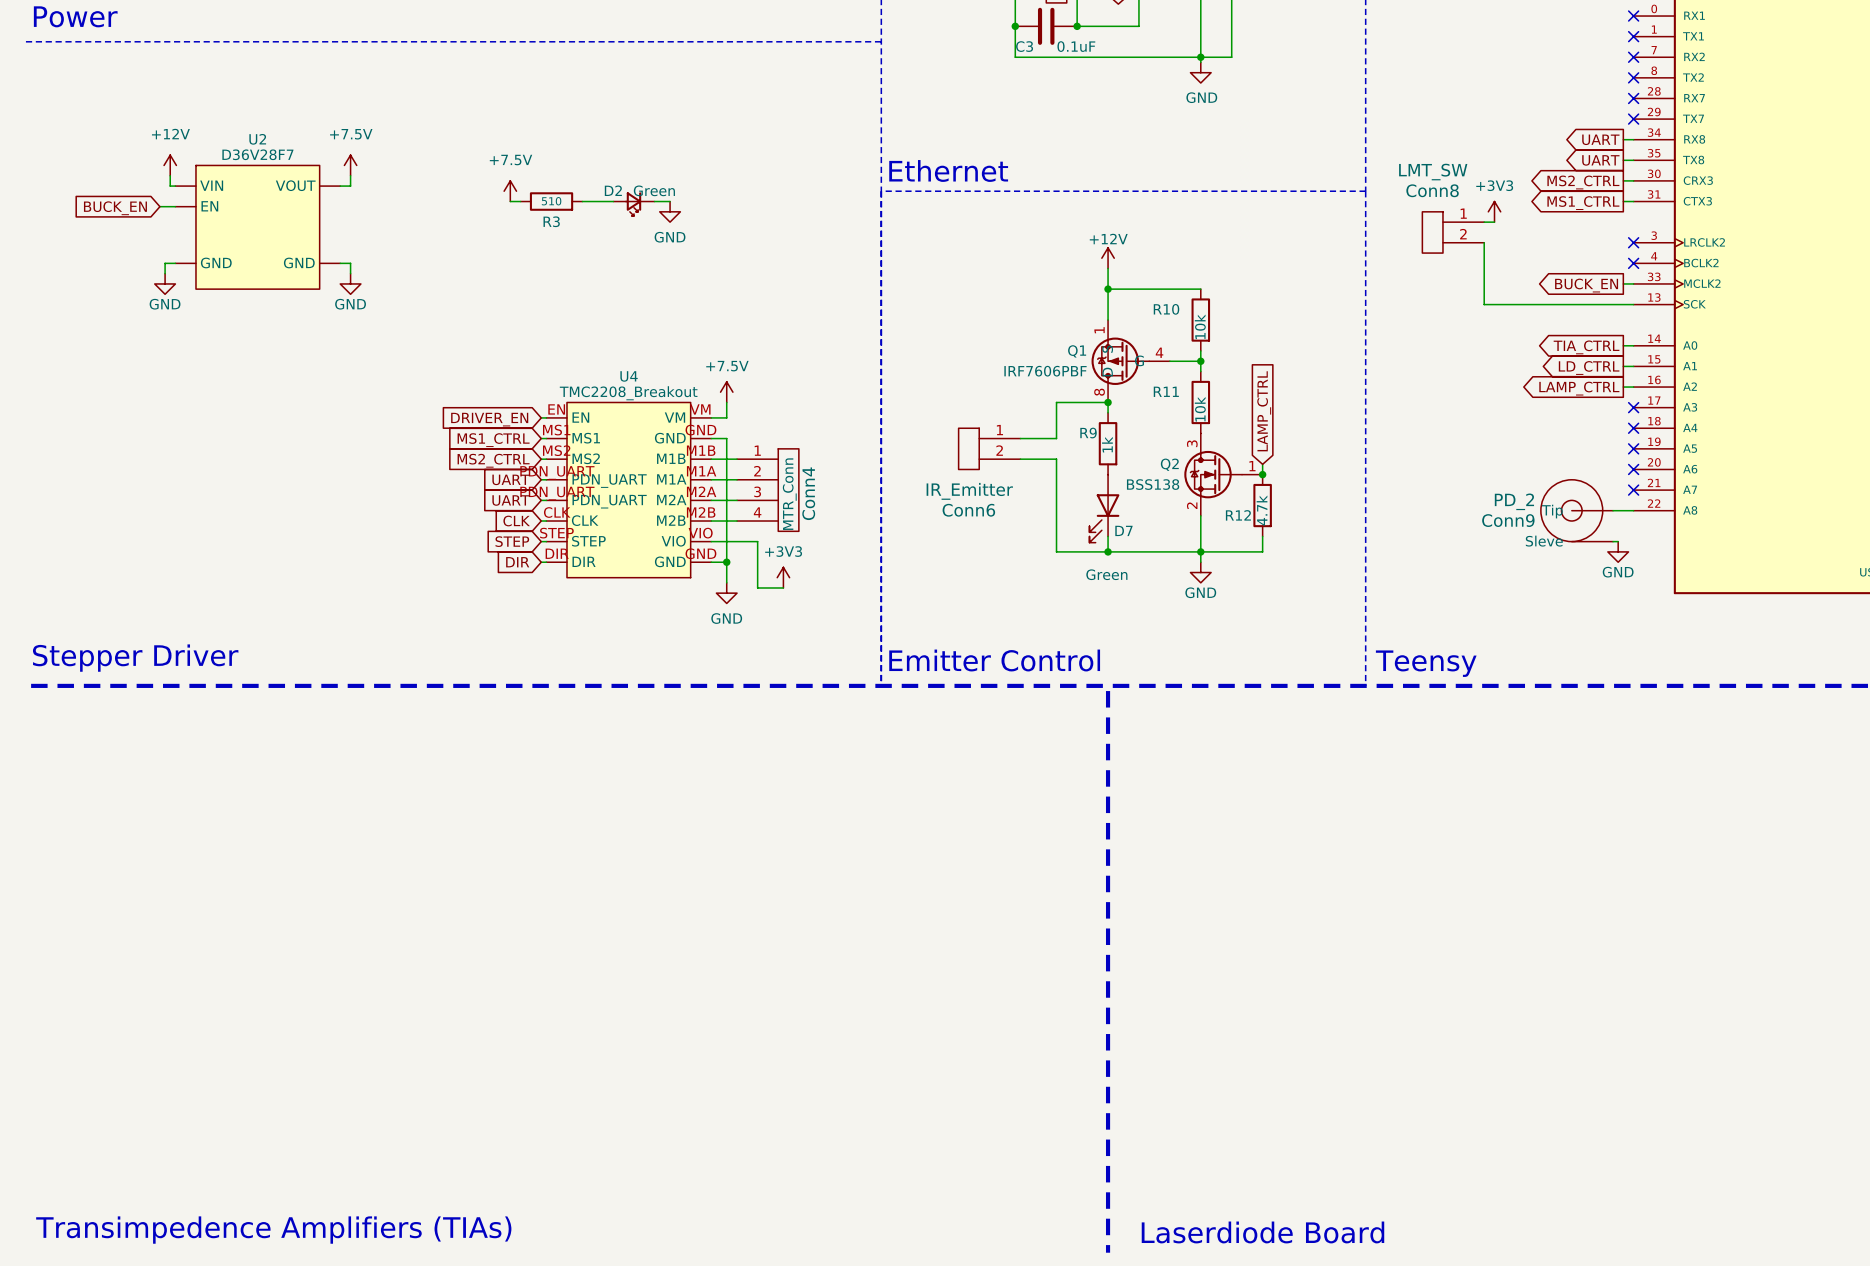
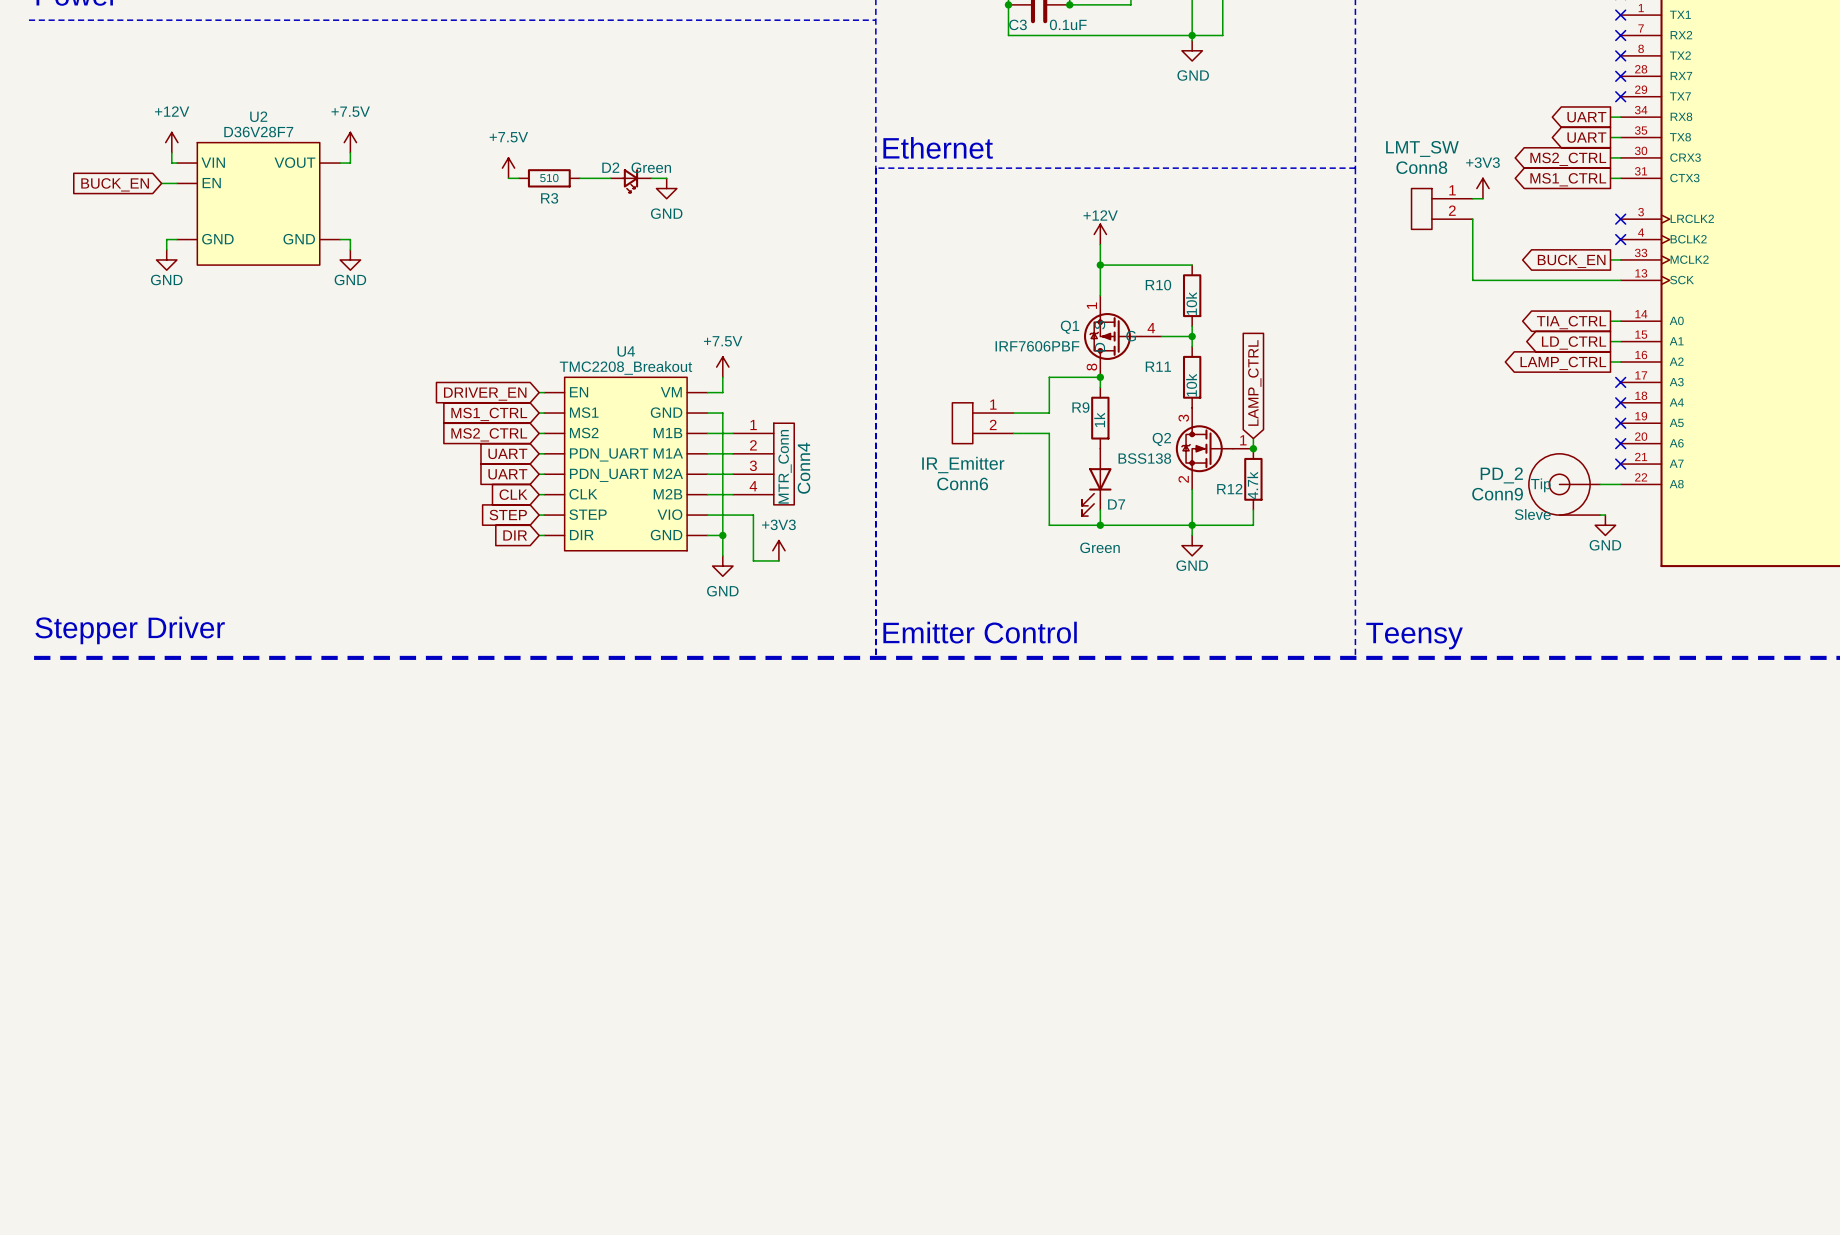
U4 symbol: [546, 402, 712, 578] -> [544, 377, 708, 551]
line: (1108, 691) (1108, 1252) -> none
text: Transimpedence Amplifiers (TIAs) (273, 1230) -> none
text: Laserdiode Board (1262, 1232) -> none

